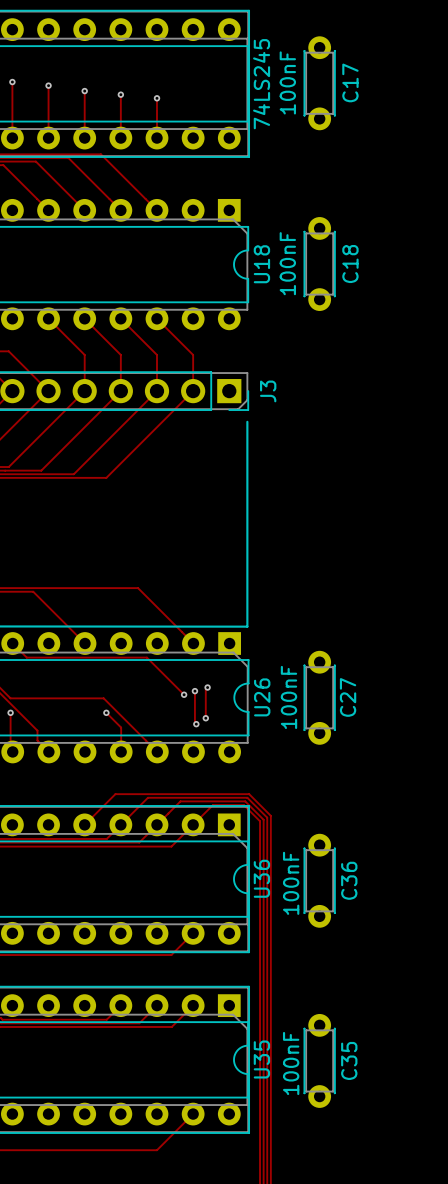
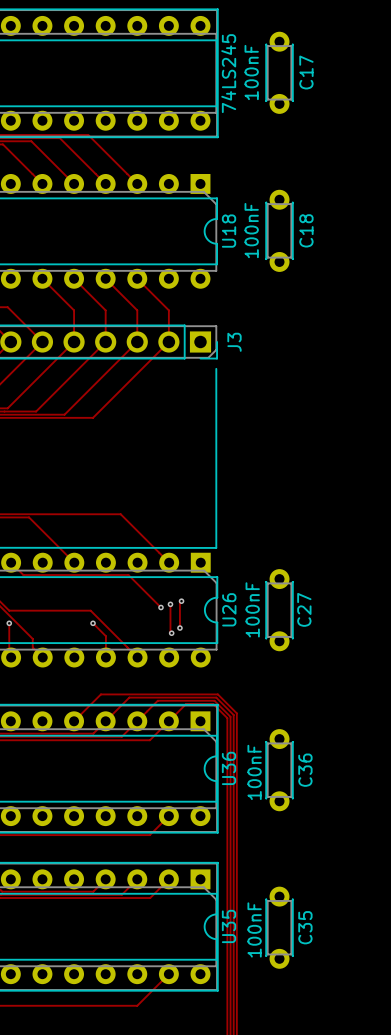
track: (12, 82) (12, 138) -> none
via: (12, 82) -> none
track: (48, 85) (48, 138) -> none
via: (48, 85) -> none
track: (84, 91) (84, 138) -> none
via: (84, 91) -> none
track: (120, 94) (120, 138) -> none
via: (120, 94) -> none
track: (156, 98) (156, 138) -> none
via: (156, 98) -> none

